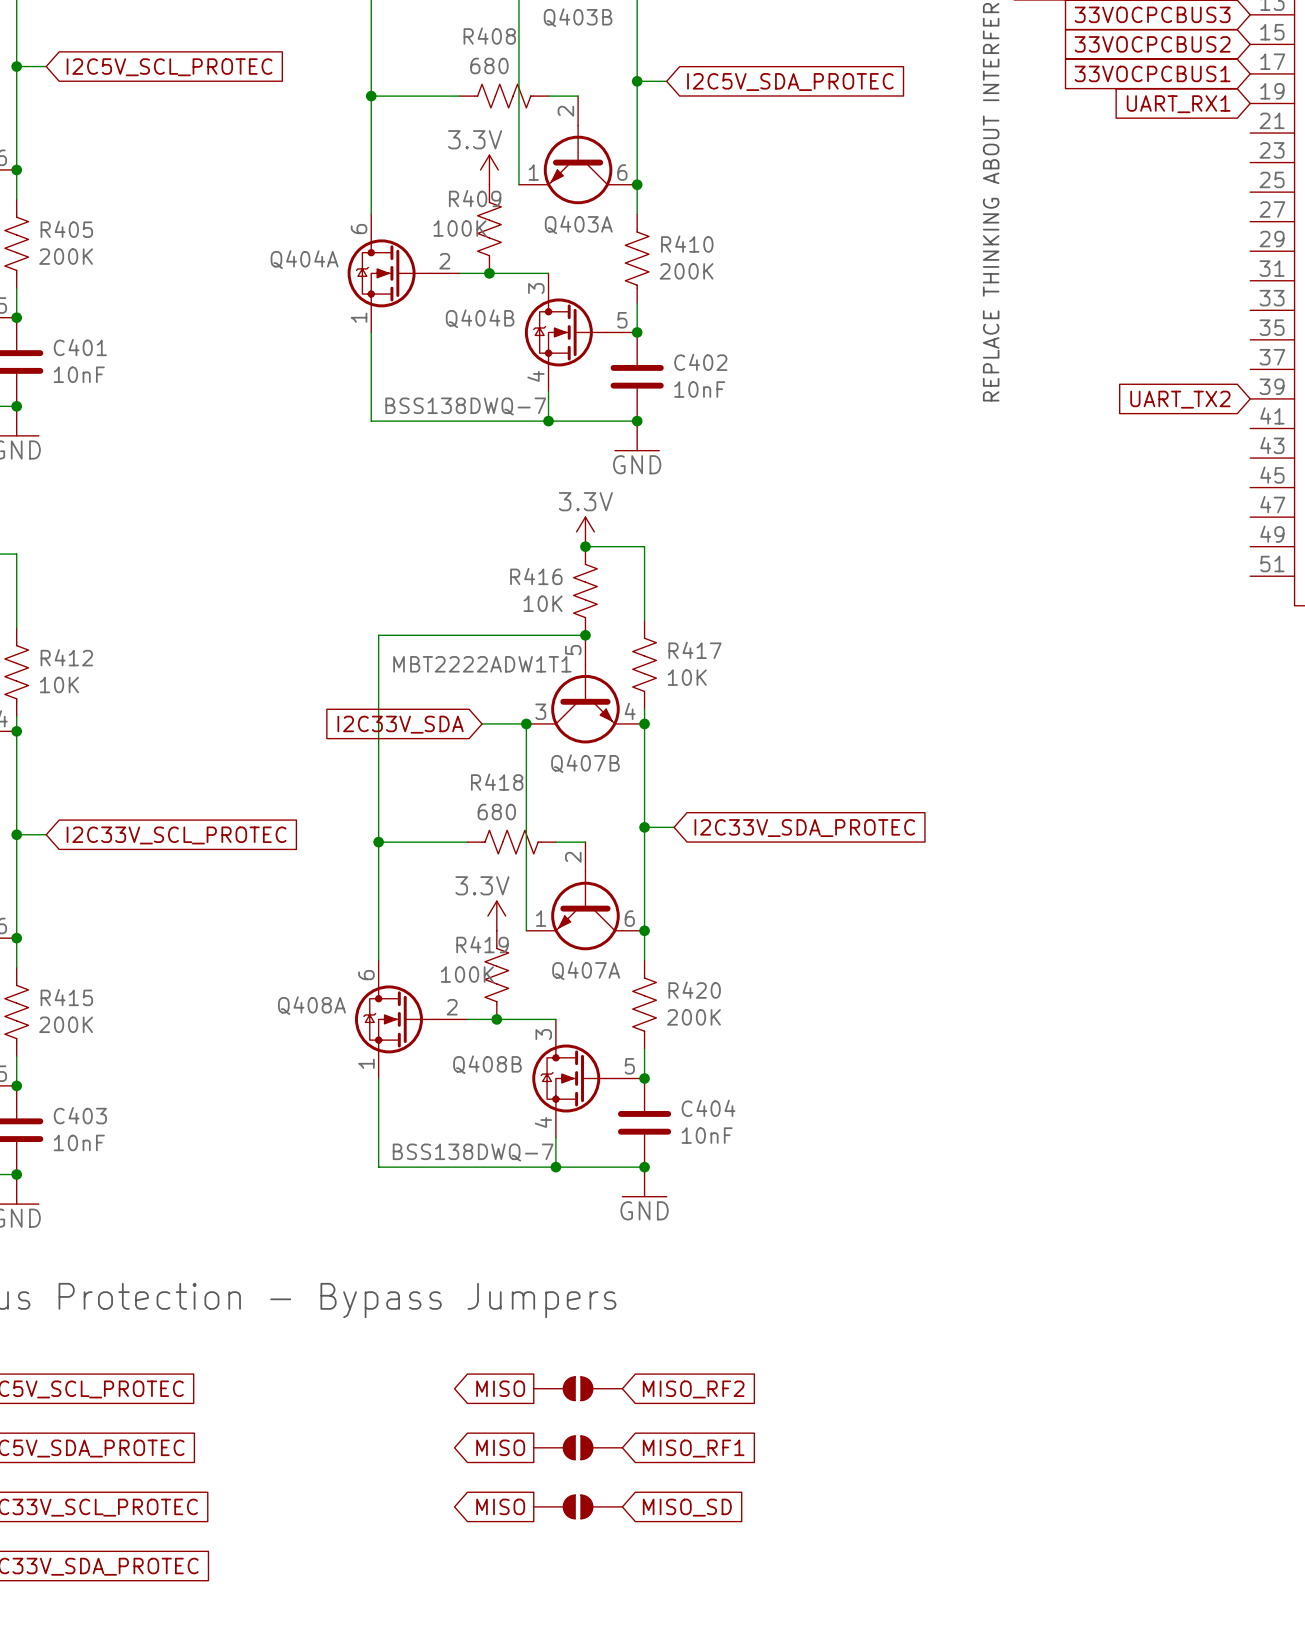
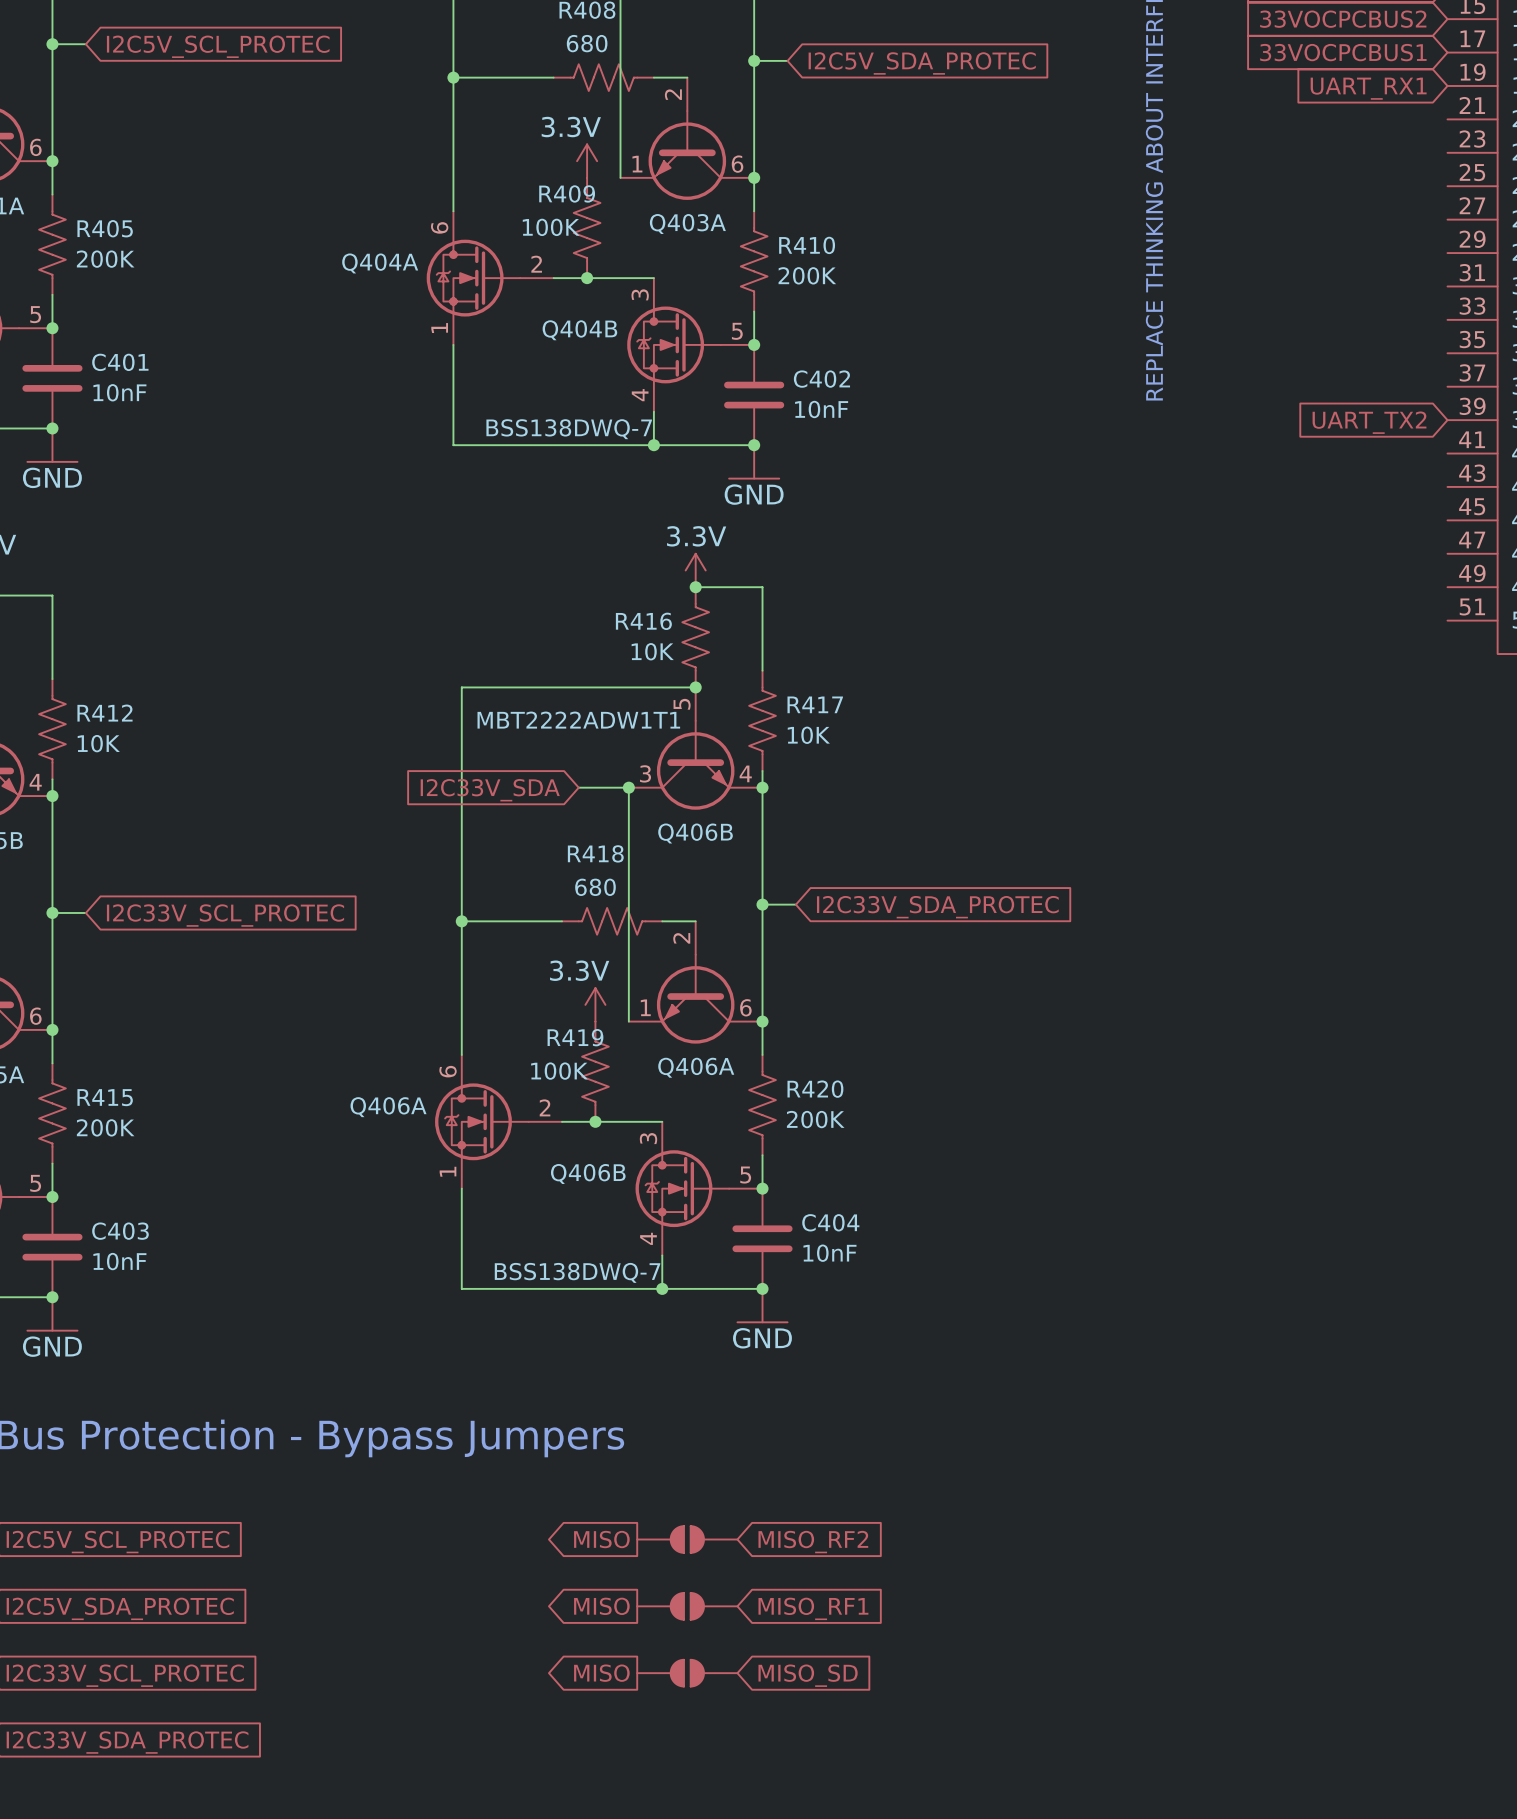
Q407B name: Q407B (585, 763) -> Q406B (695, 833)
Q407A name: Q407A (586, 970) -> Q406A (696, 1067)
Q408A name: Q408A (311, 1005) -> Q406A (388, 1107)
Q408B name: Q408B (487, 1064) -> Q406B (588, 1173)

